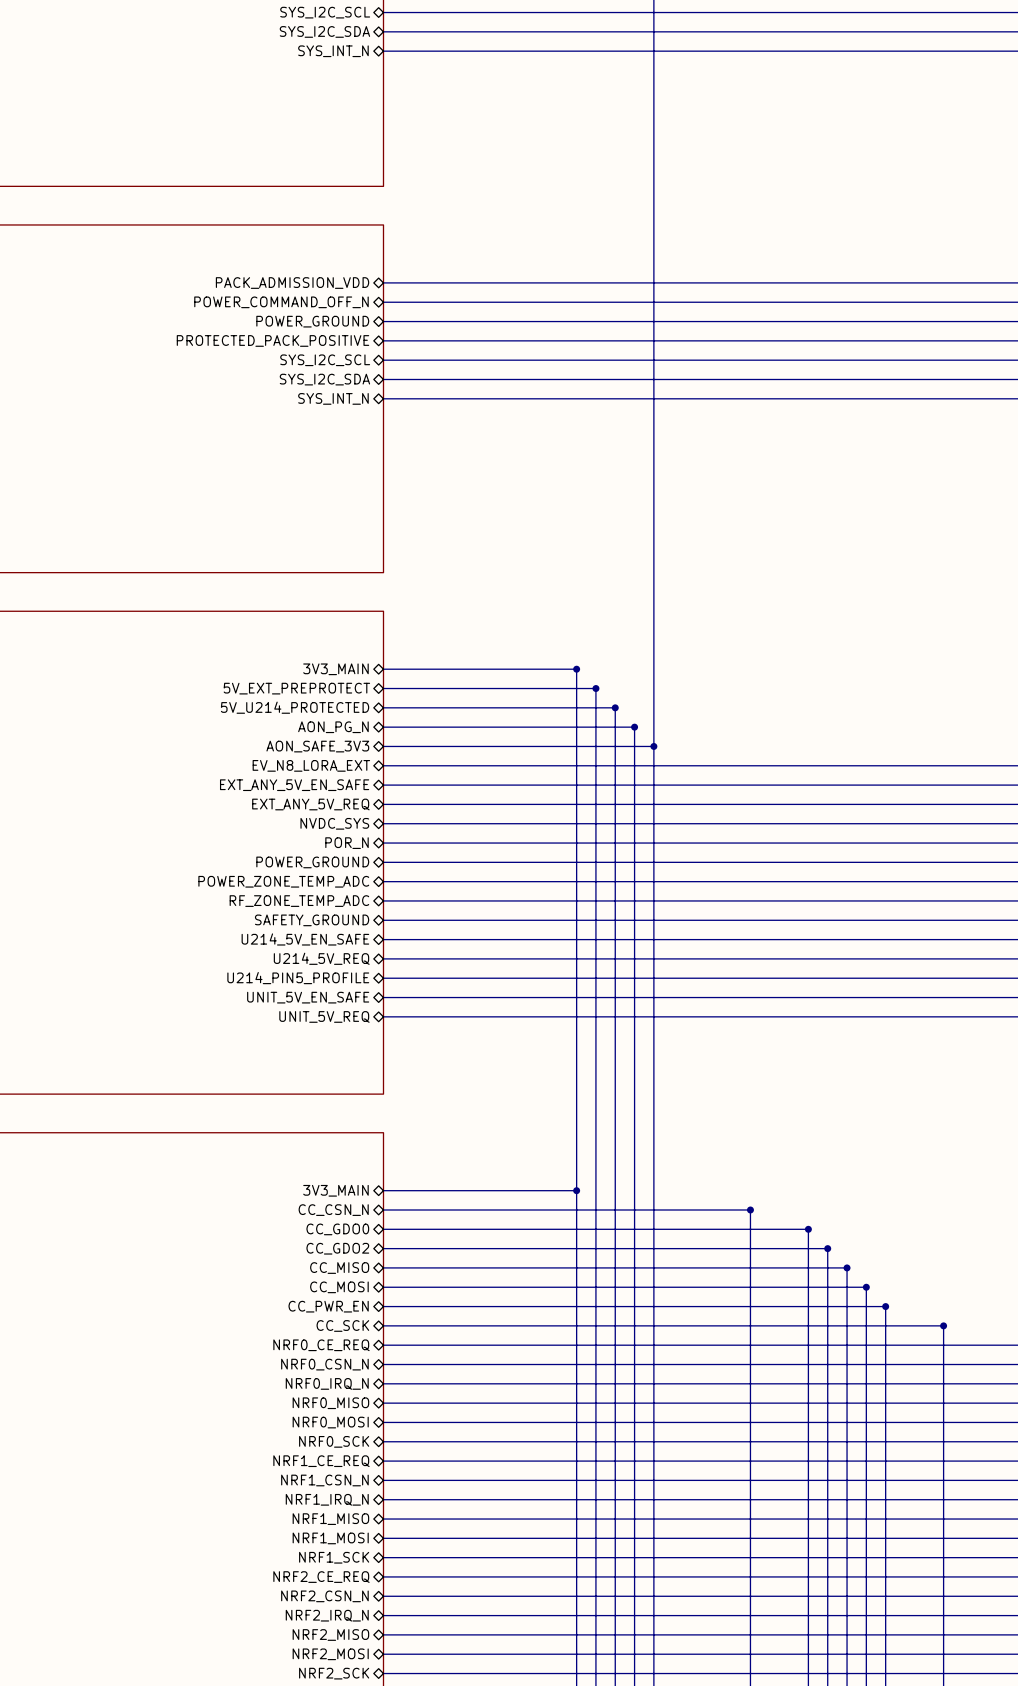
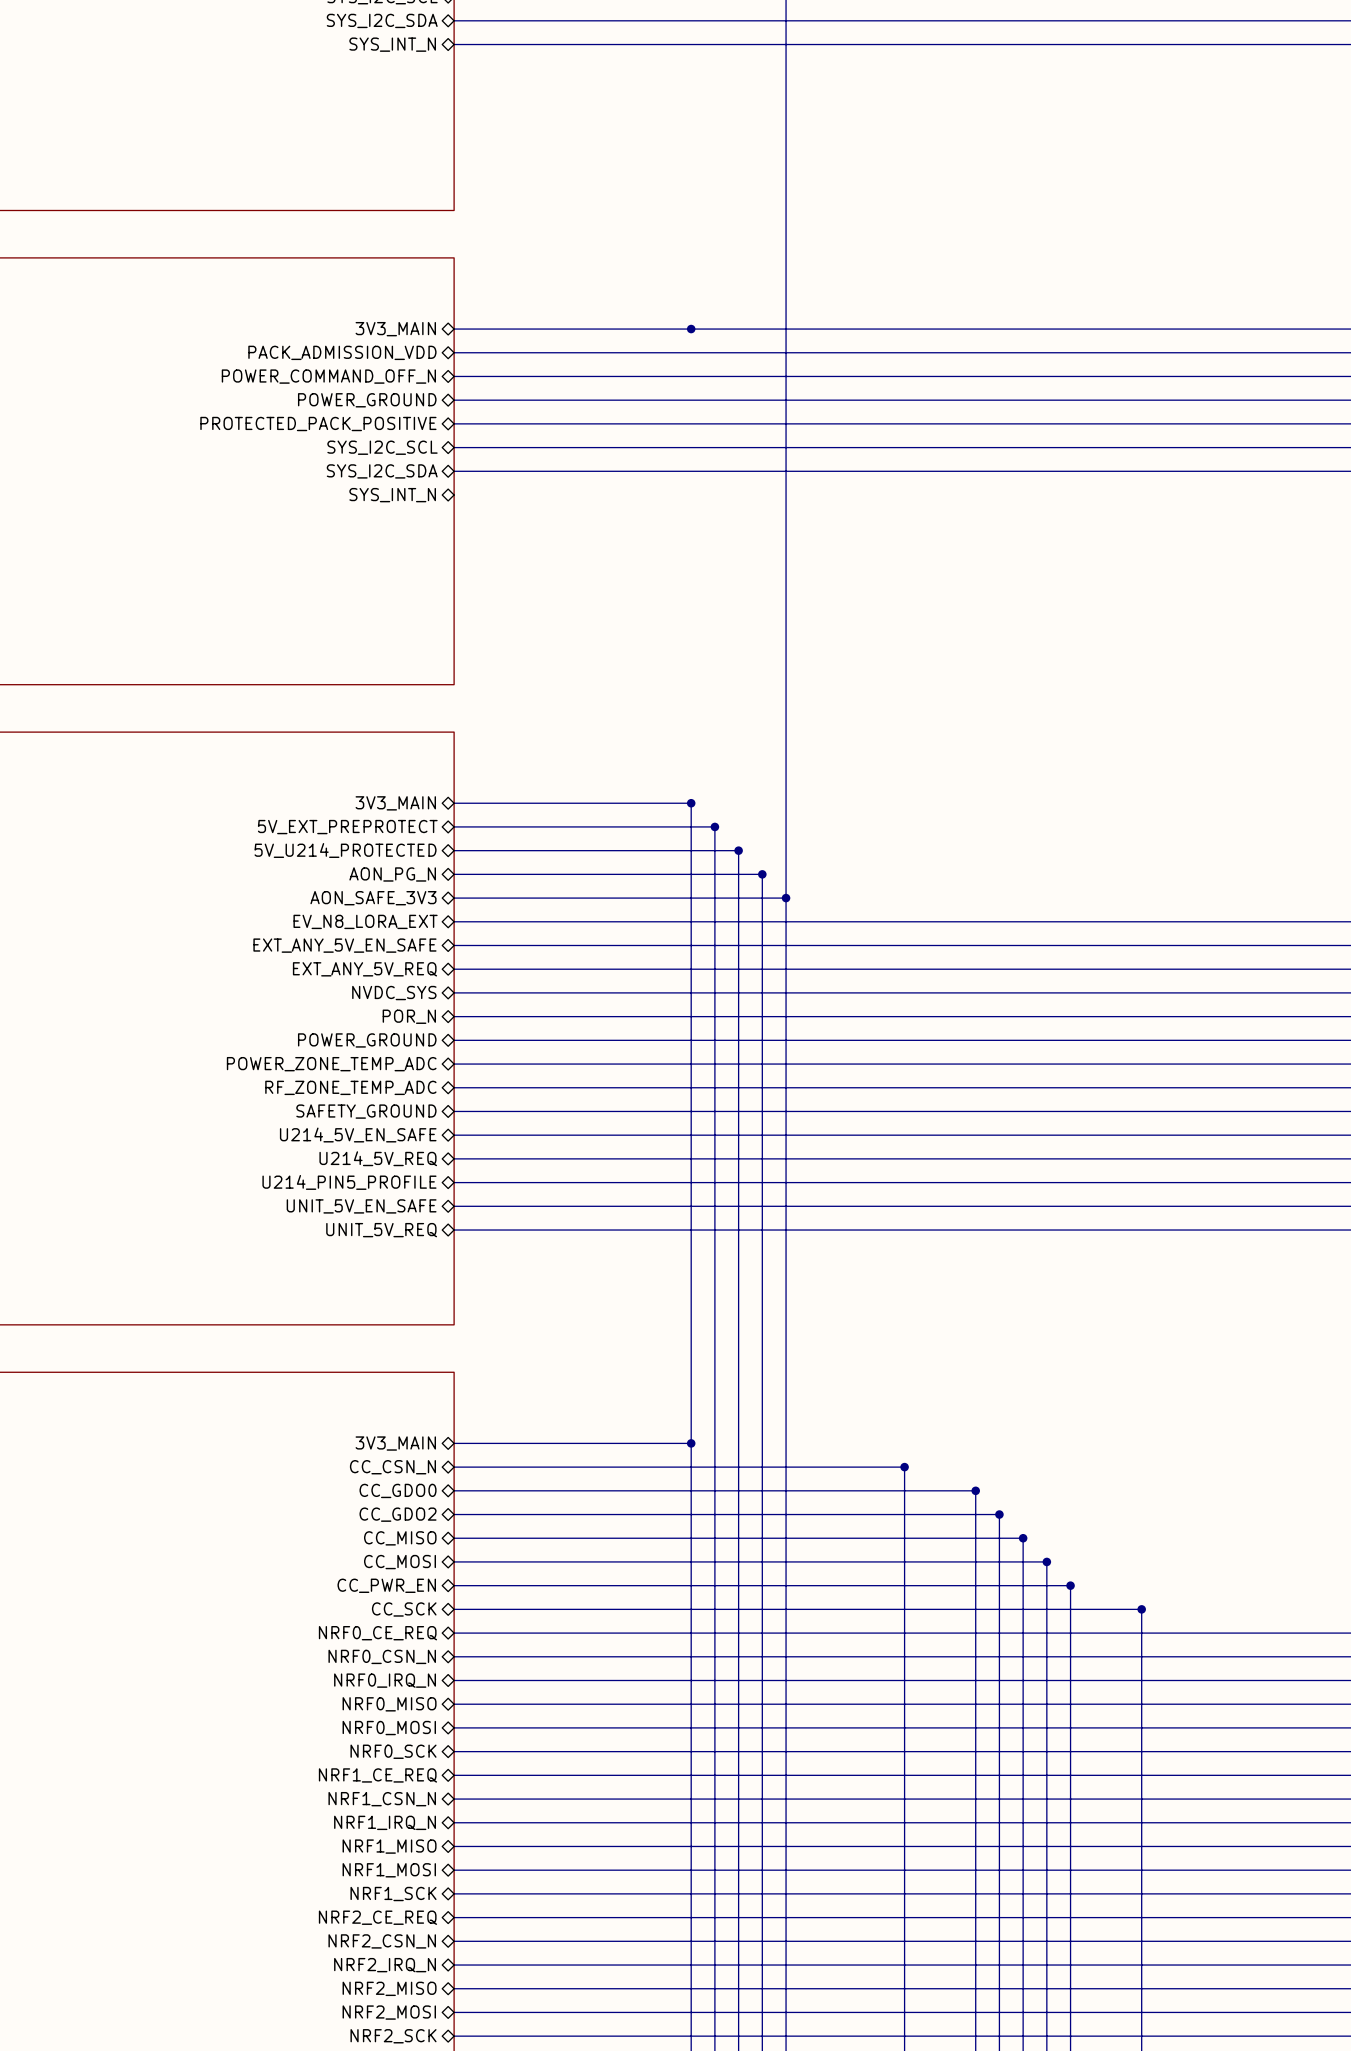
junction: none -> (691, 329)
sheet pin: PACK_ADMISSION_VDD (292, 283) -> 3V3_MAIN (395, 329)
sheet pin: POWER_COMMAND_OFF_N (281, 302) -> PACK_ADMISSION_VDD (342, 352)
sheet pin: POWER_GROUND (312, 321) -> POWER_COMMAND_OFF_N (328, 376)
sheet pin: PROTECTED_PACK_POSITIVE (272, 340) -> POWER_GROUND (367, 400)
sheet pin: SYS_I2C_SCL (325, 360) -> PROTECTED_PACK_POSITIVE (318, 424)
sheet pin: SYS_I2C_SDA (324, 379) -> SYS_I2C_SCL (382, 447)
sheet pin: SYS_INT_N (333, 398) -> SYS_I2C_SDA (382, 471)
sheet pin: none -> SYS_INT_N (392, 495)

